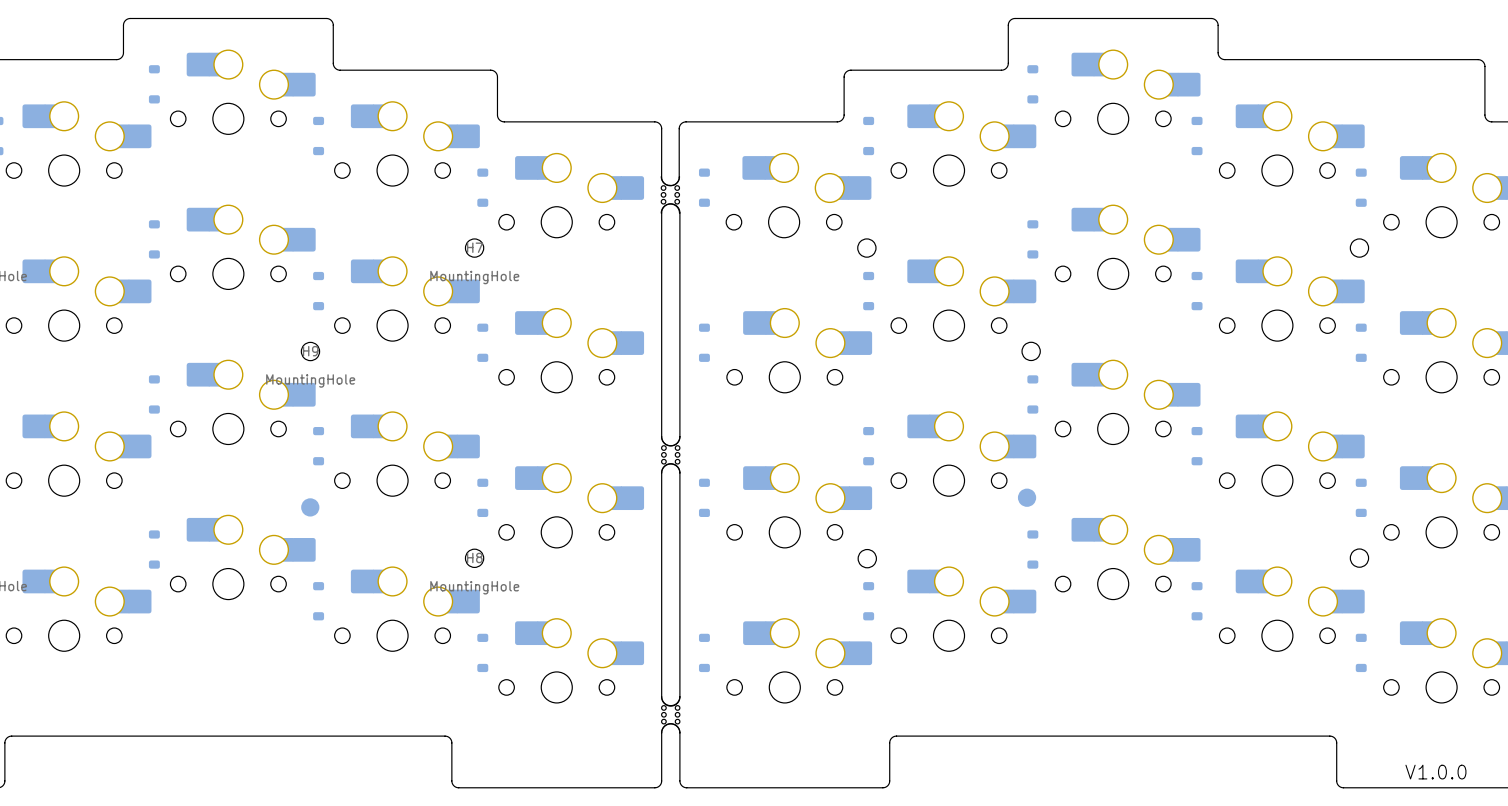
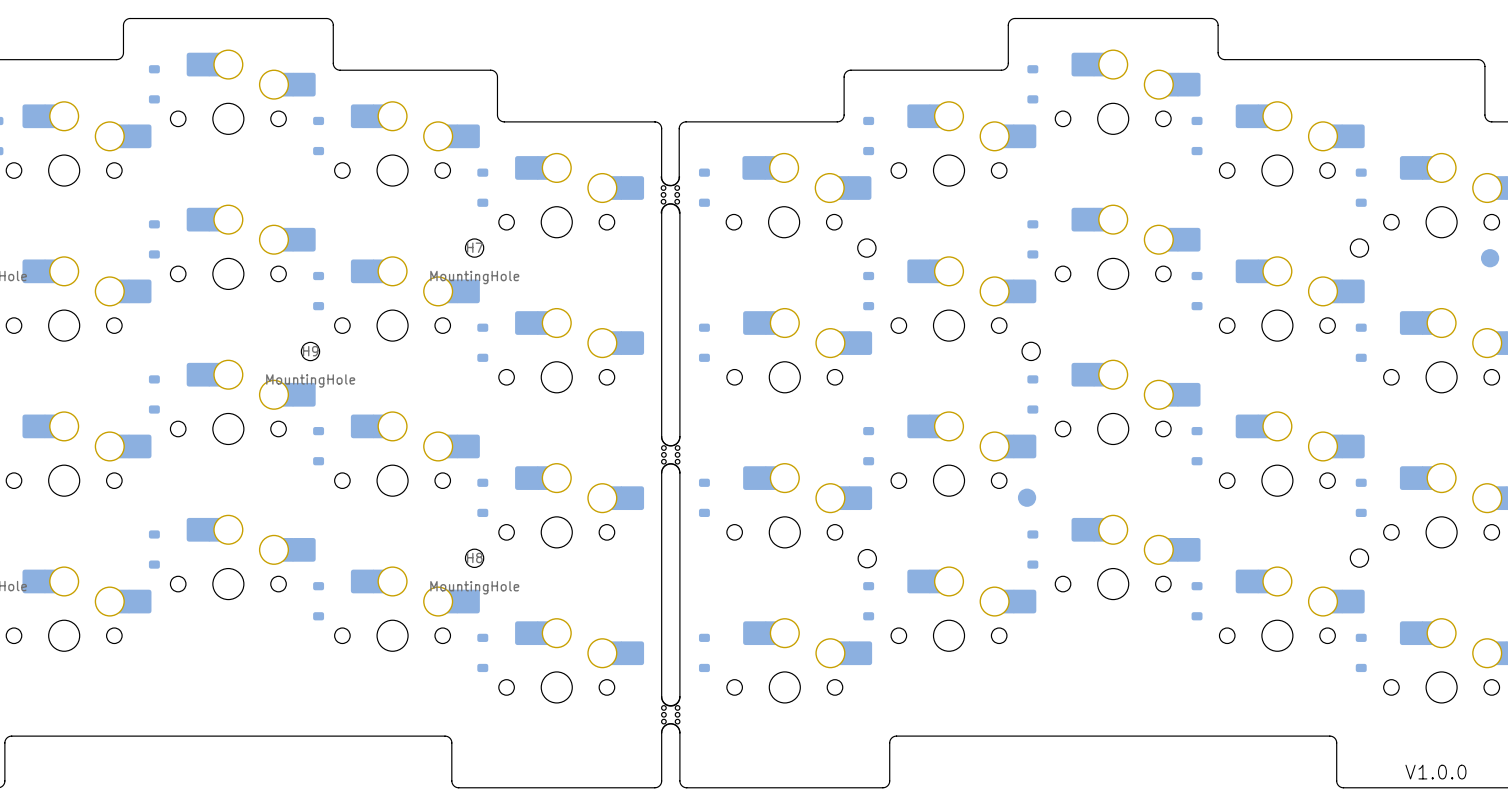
part: none -> (1490, 258)
part: (310, 507) -> none

